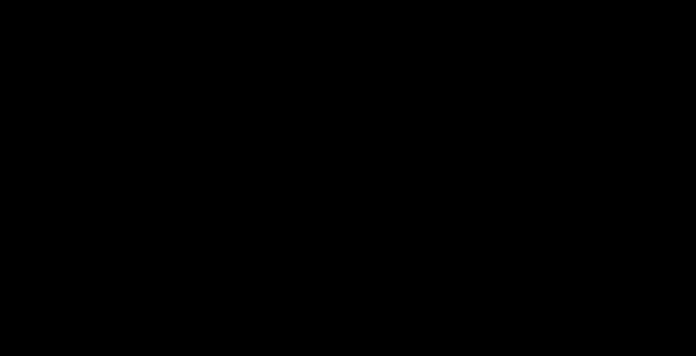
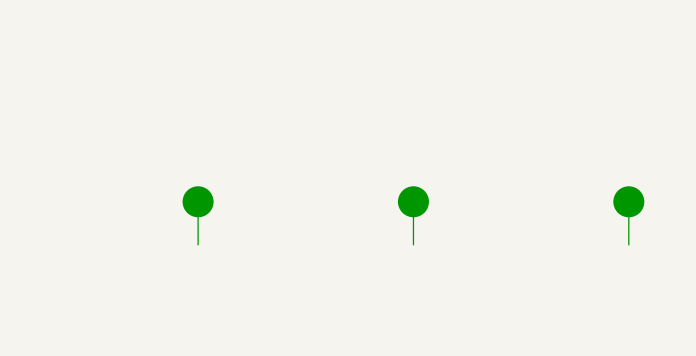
wire: none -> (198, 201) (198, 244)
junction: none -> (198, 201)
wire: none -> (413, 201) (413, 244)
junction: none -> (413, 201)
wire: none -> (628, 201) (628, 244)
junction: none -> (628, 201)

